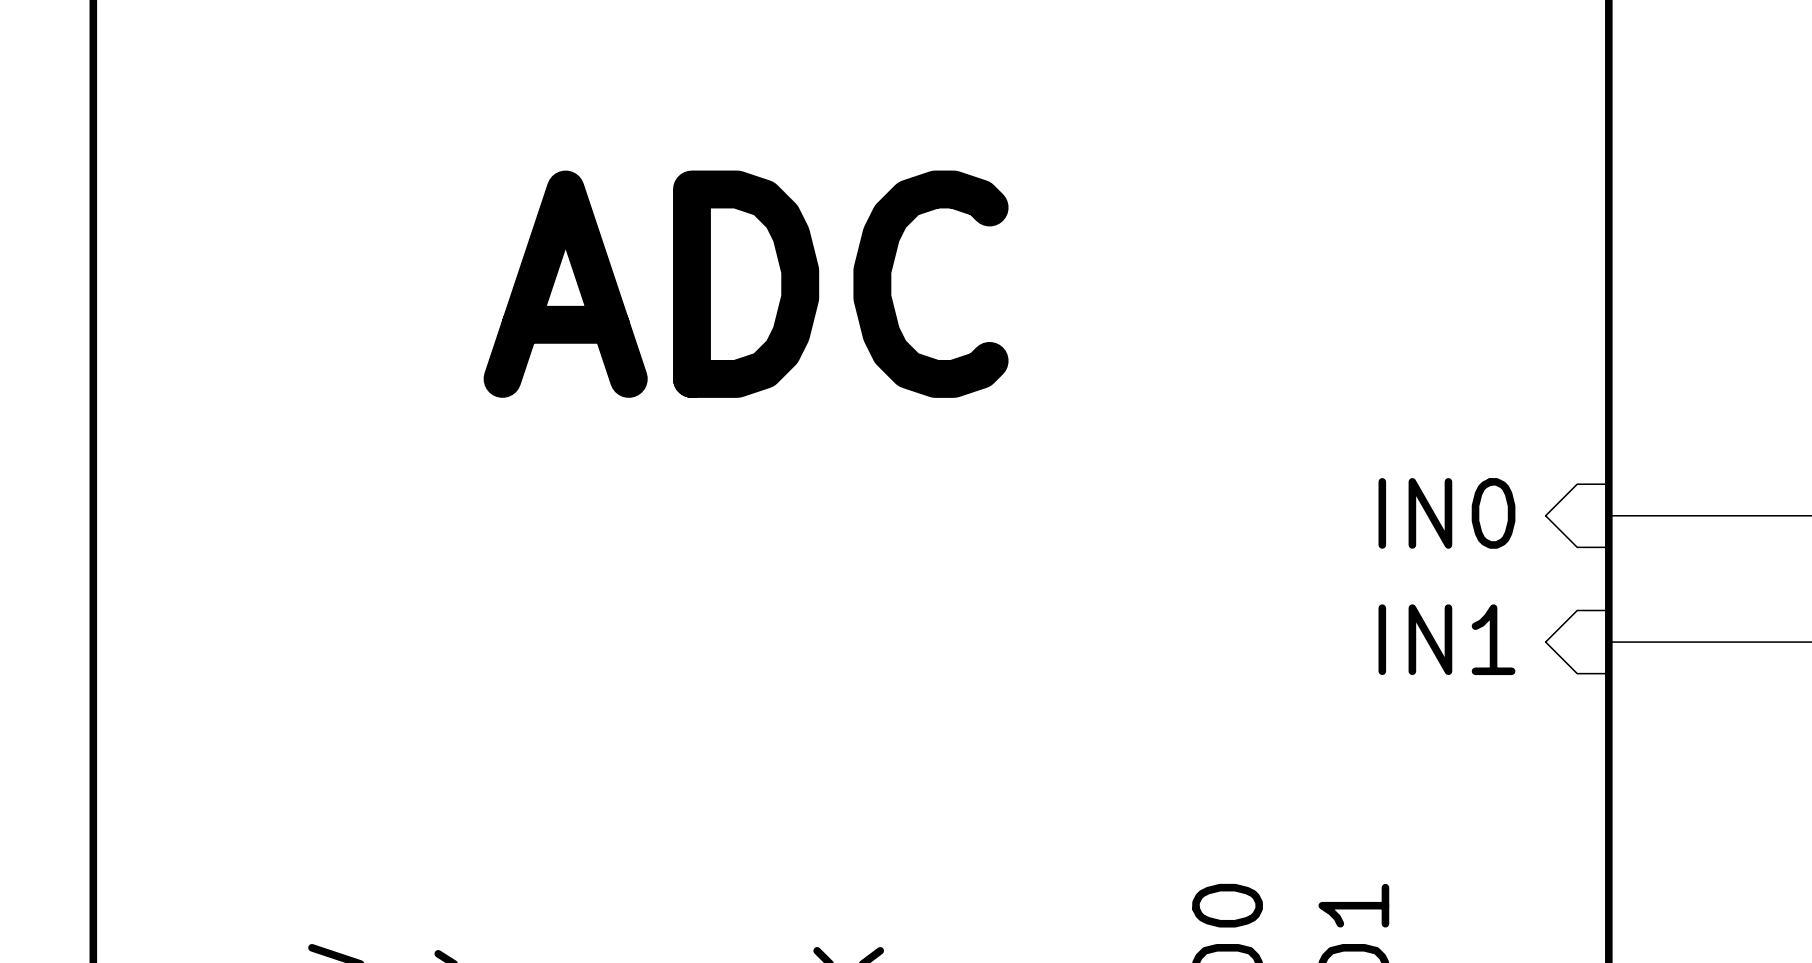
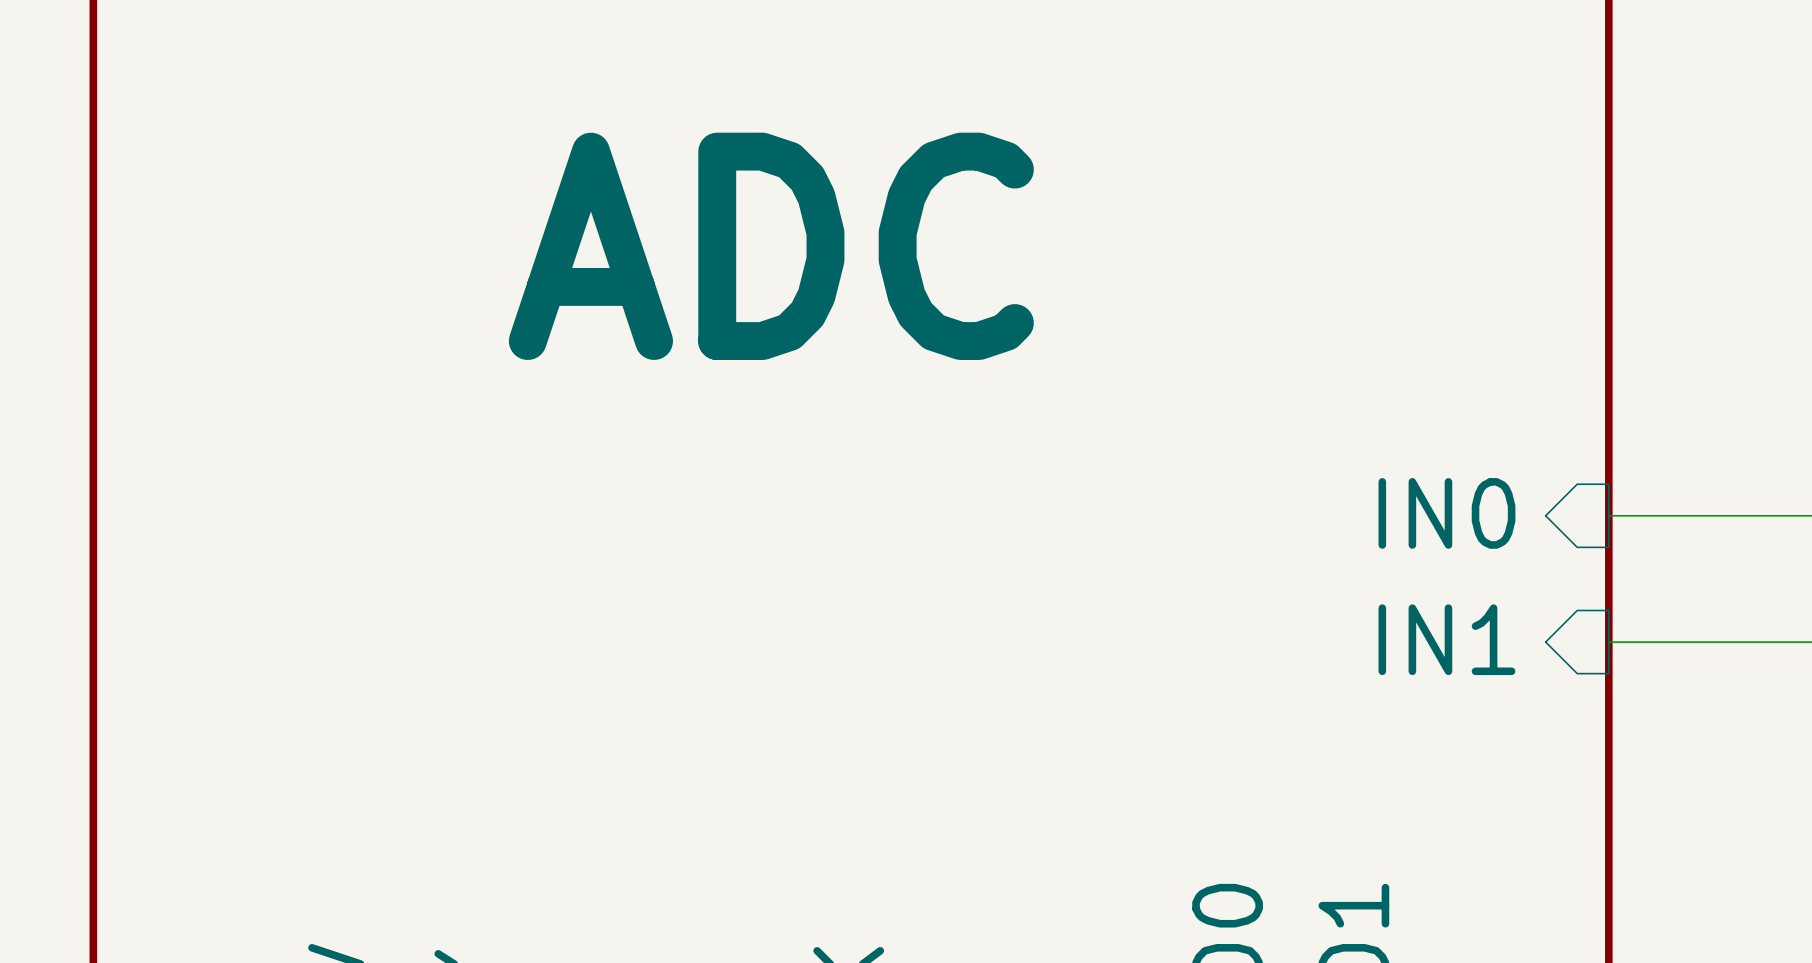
sheet ADC name position: ADC (746, 284) -> ADC (771, 246)

